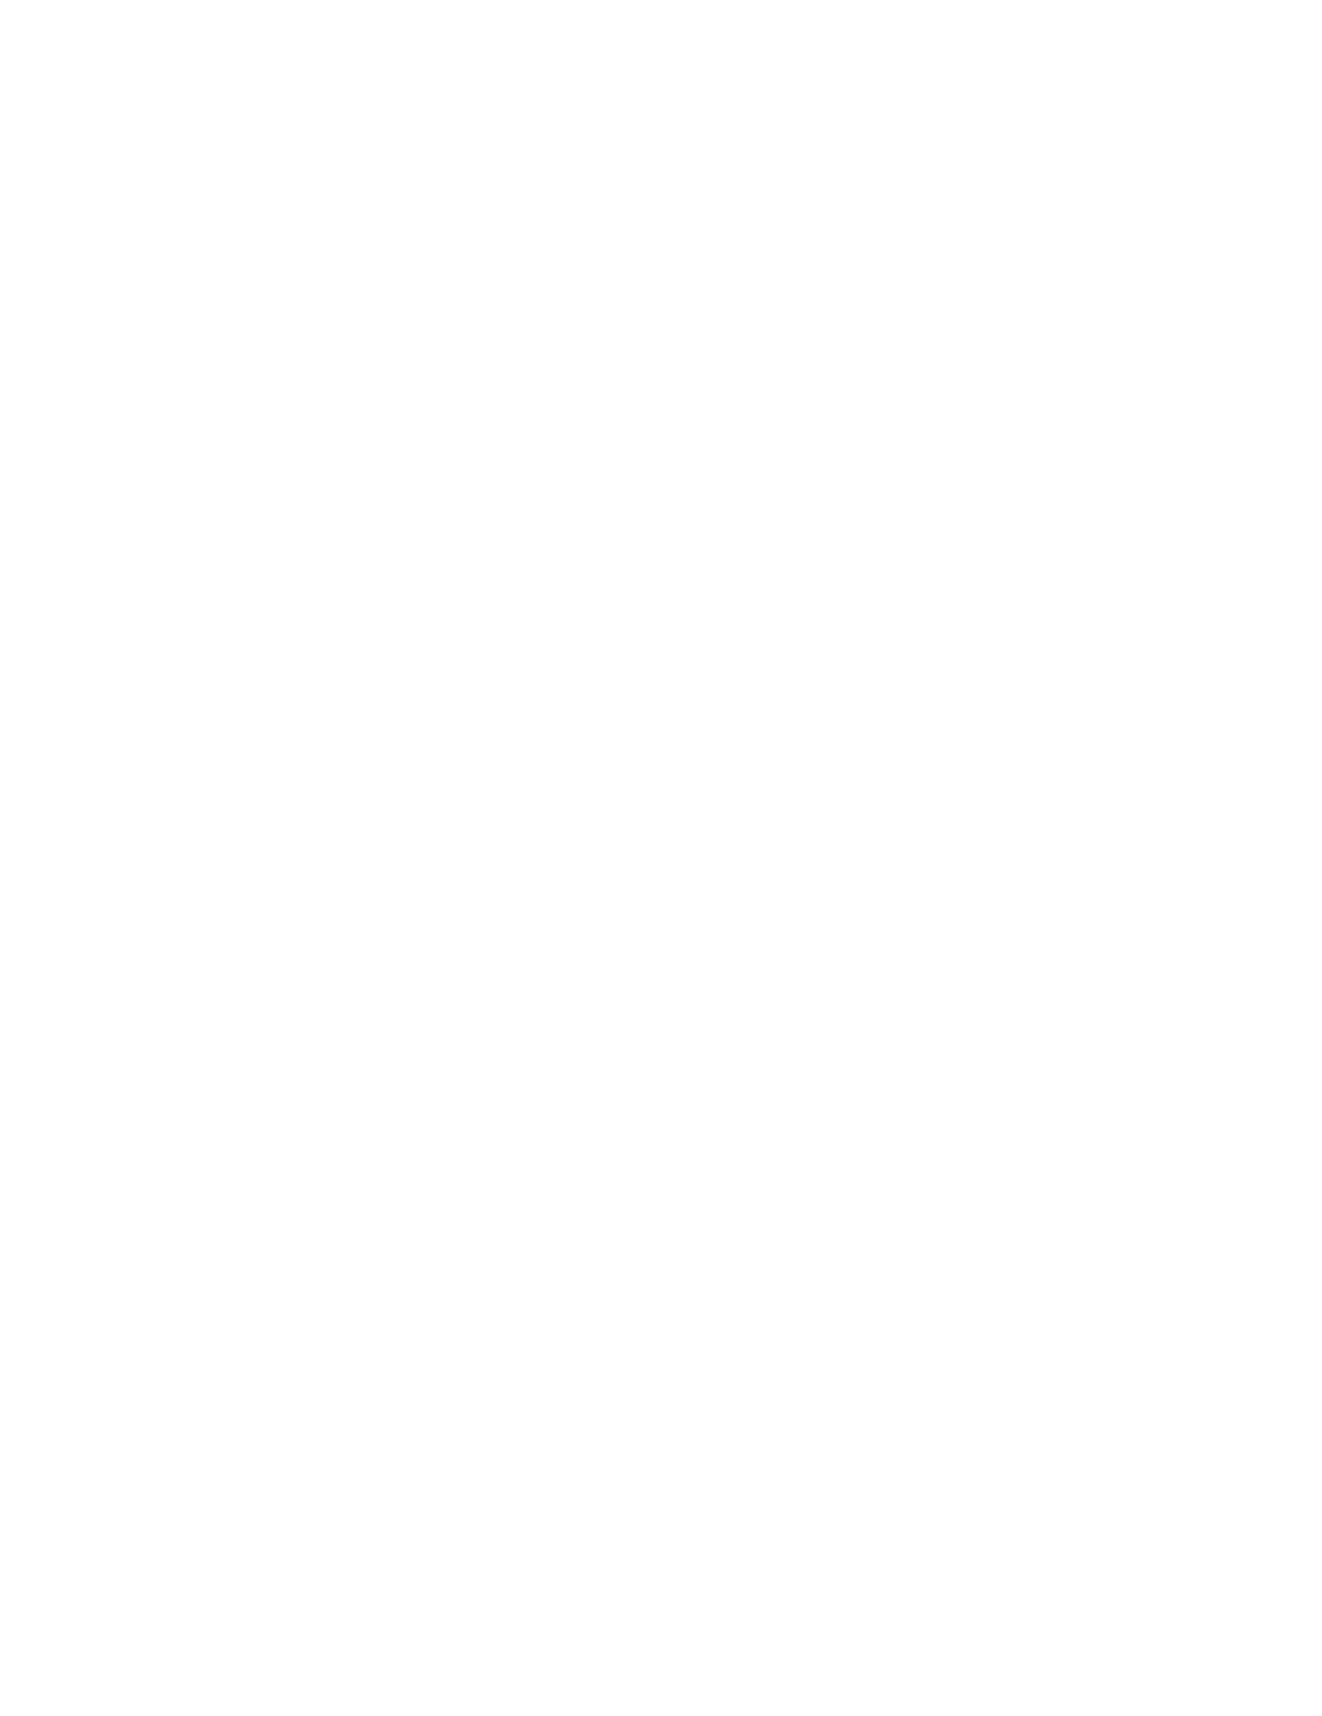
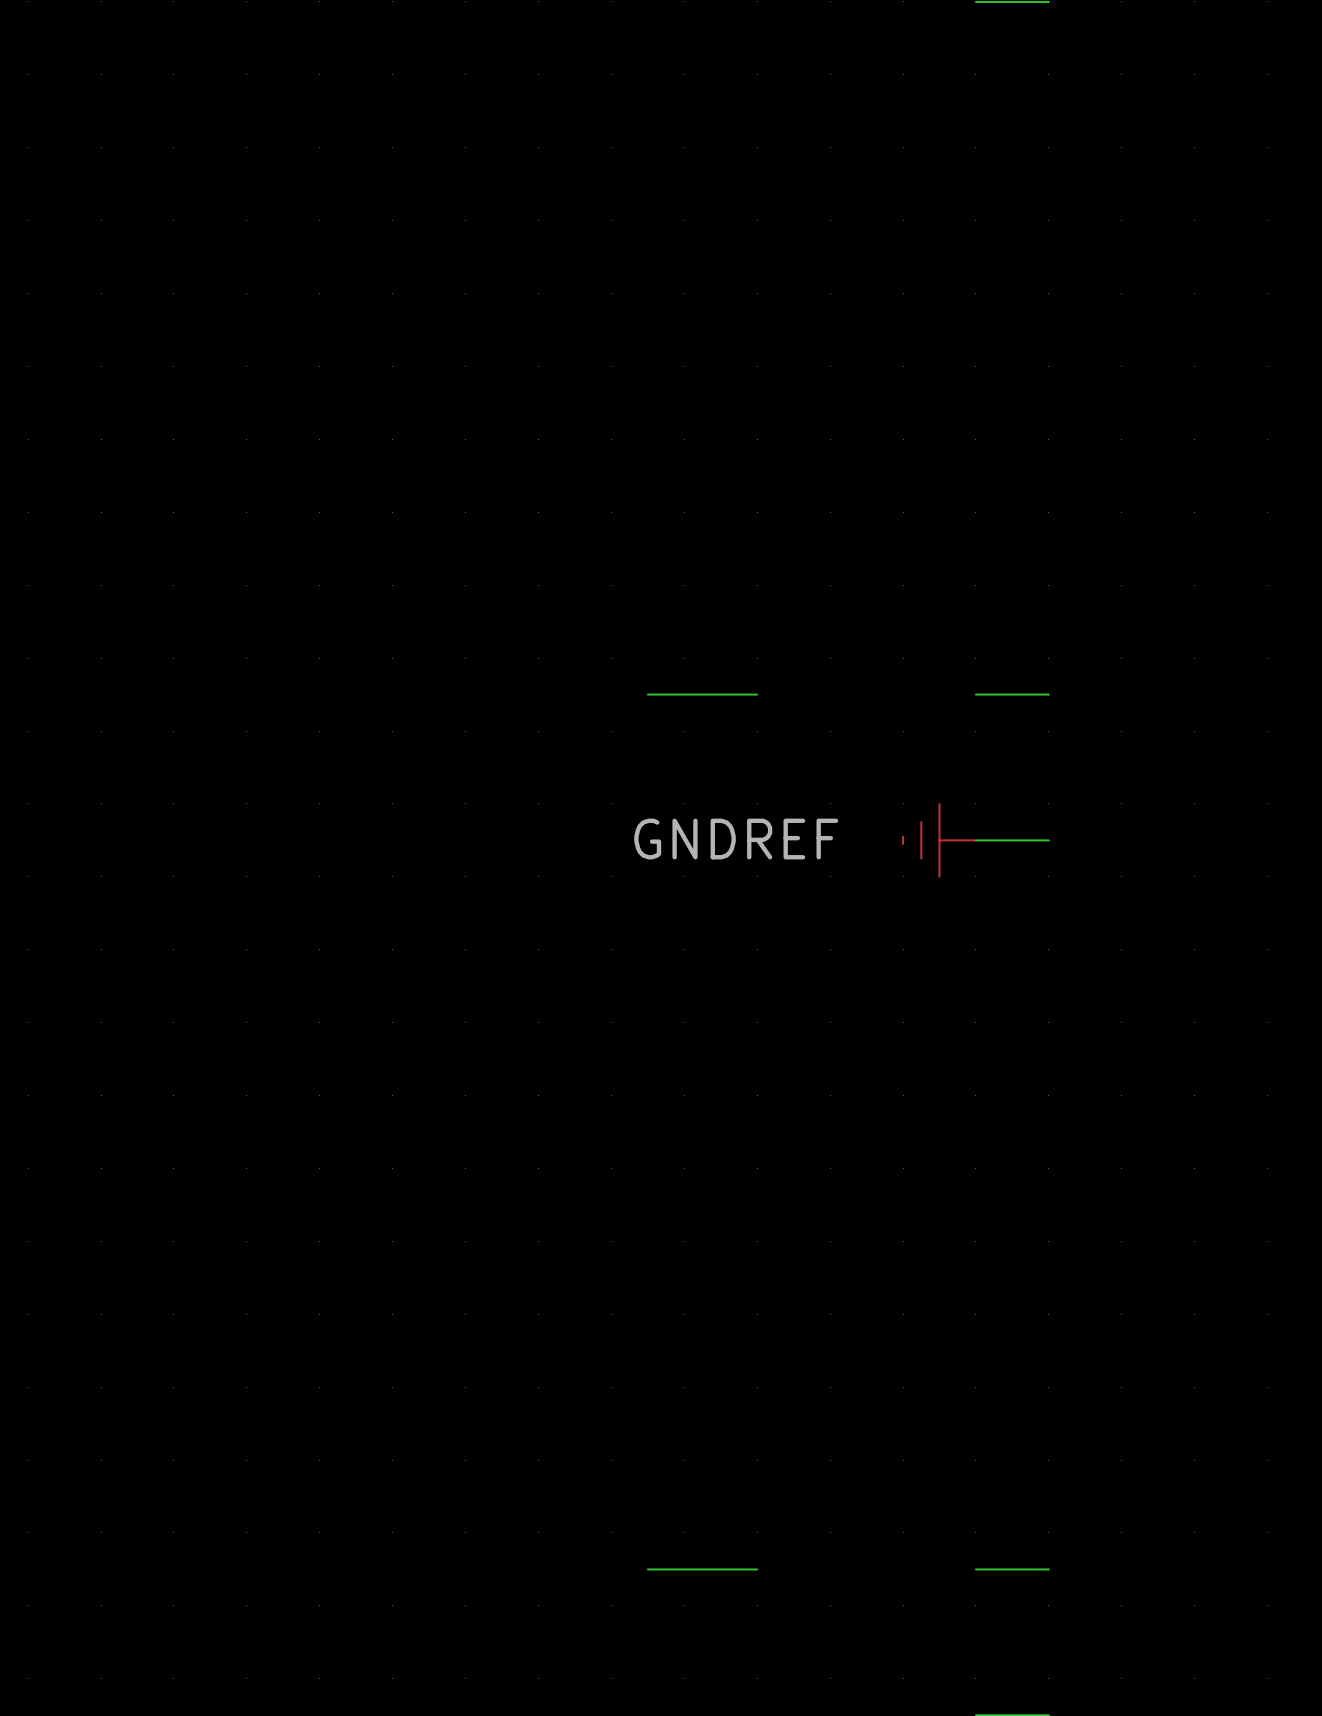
wire: none -> (975, 1) (1048, 1)
wire: none -> (647, 694) (757, 694)
wire: none -> (975, 694) (1048, 694)
power symbol: none -> GNDREF (939, 840)
wire: none -> (975, 840) (1048, 840)
wire: none -> (647, 1569) (757, 1569)
wire: none -> (975, 1569) (1048, 1569)
wire: none -> (975, 1715) (1048, 1715)

